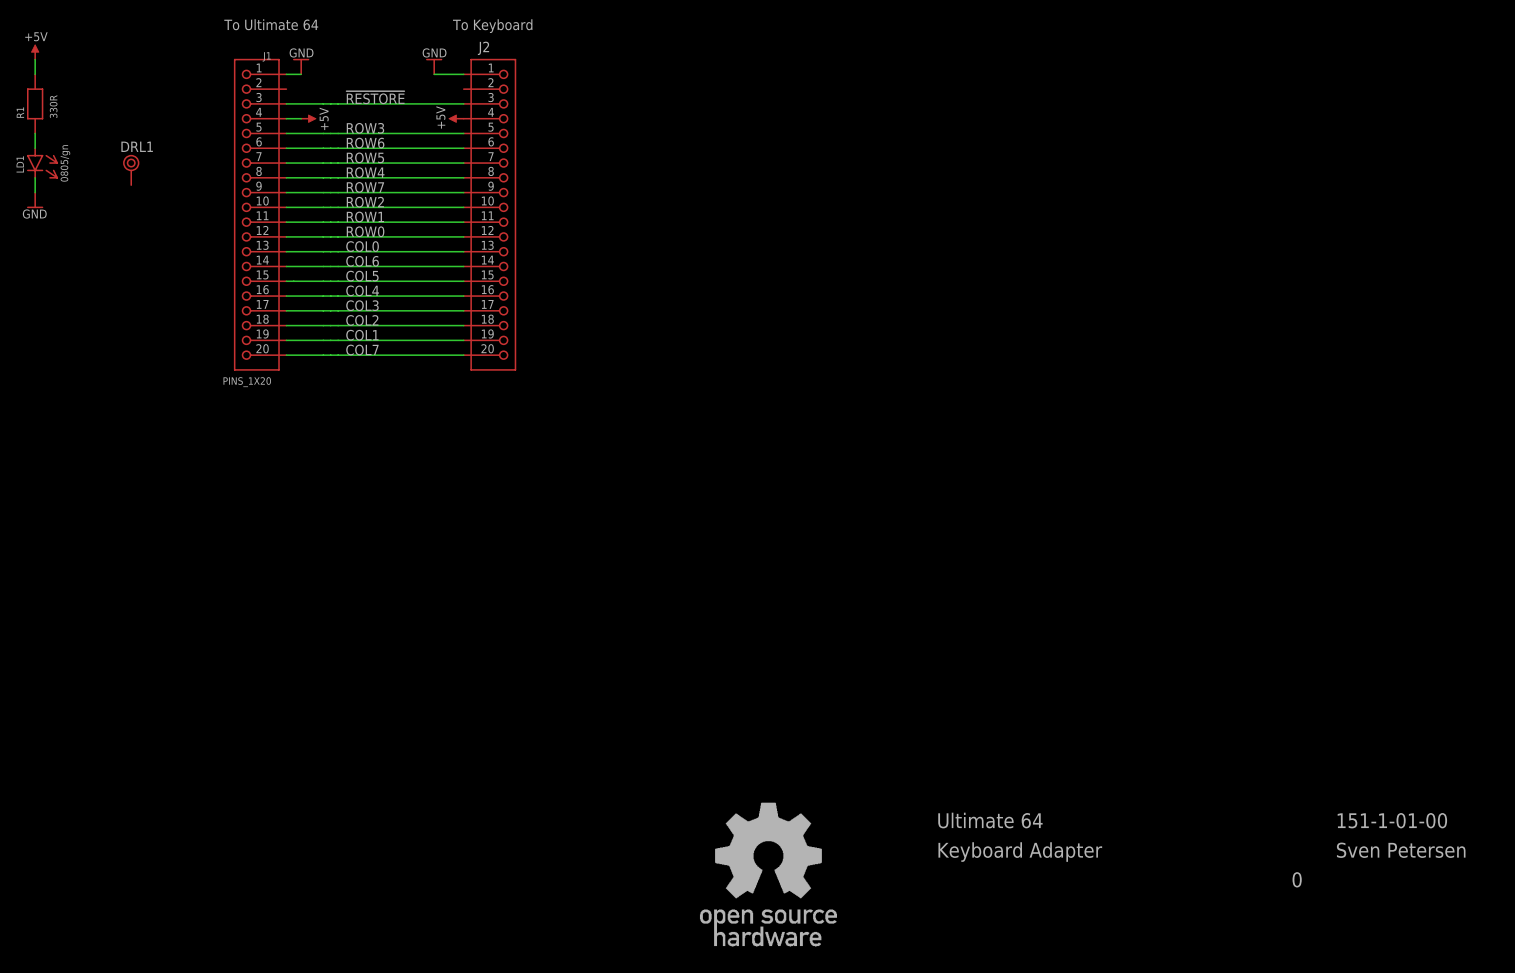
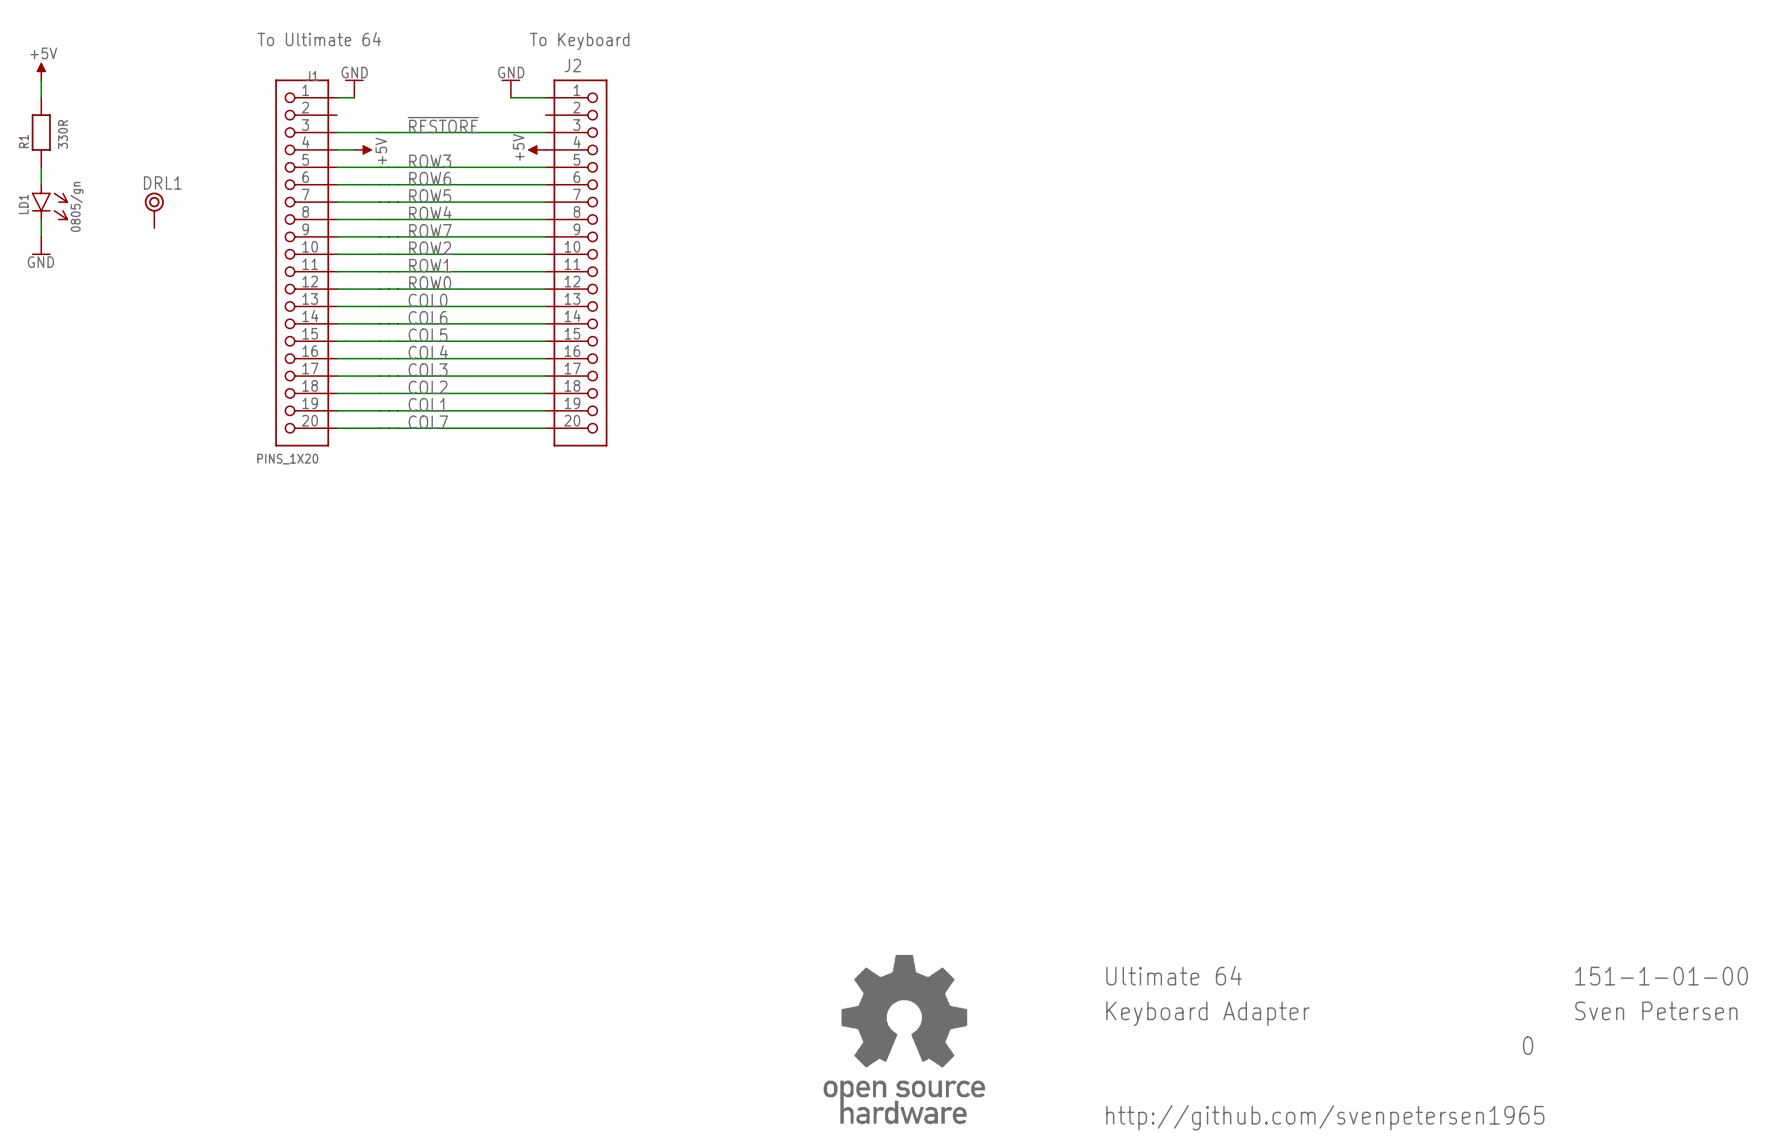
text: none -> http://github.com/svenpetersen1965 (1325, 1117)

